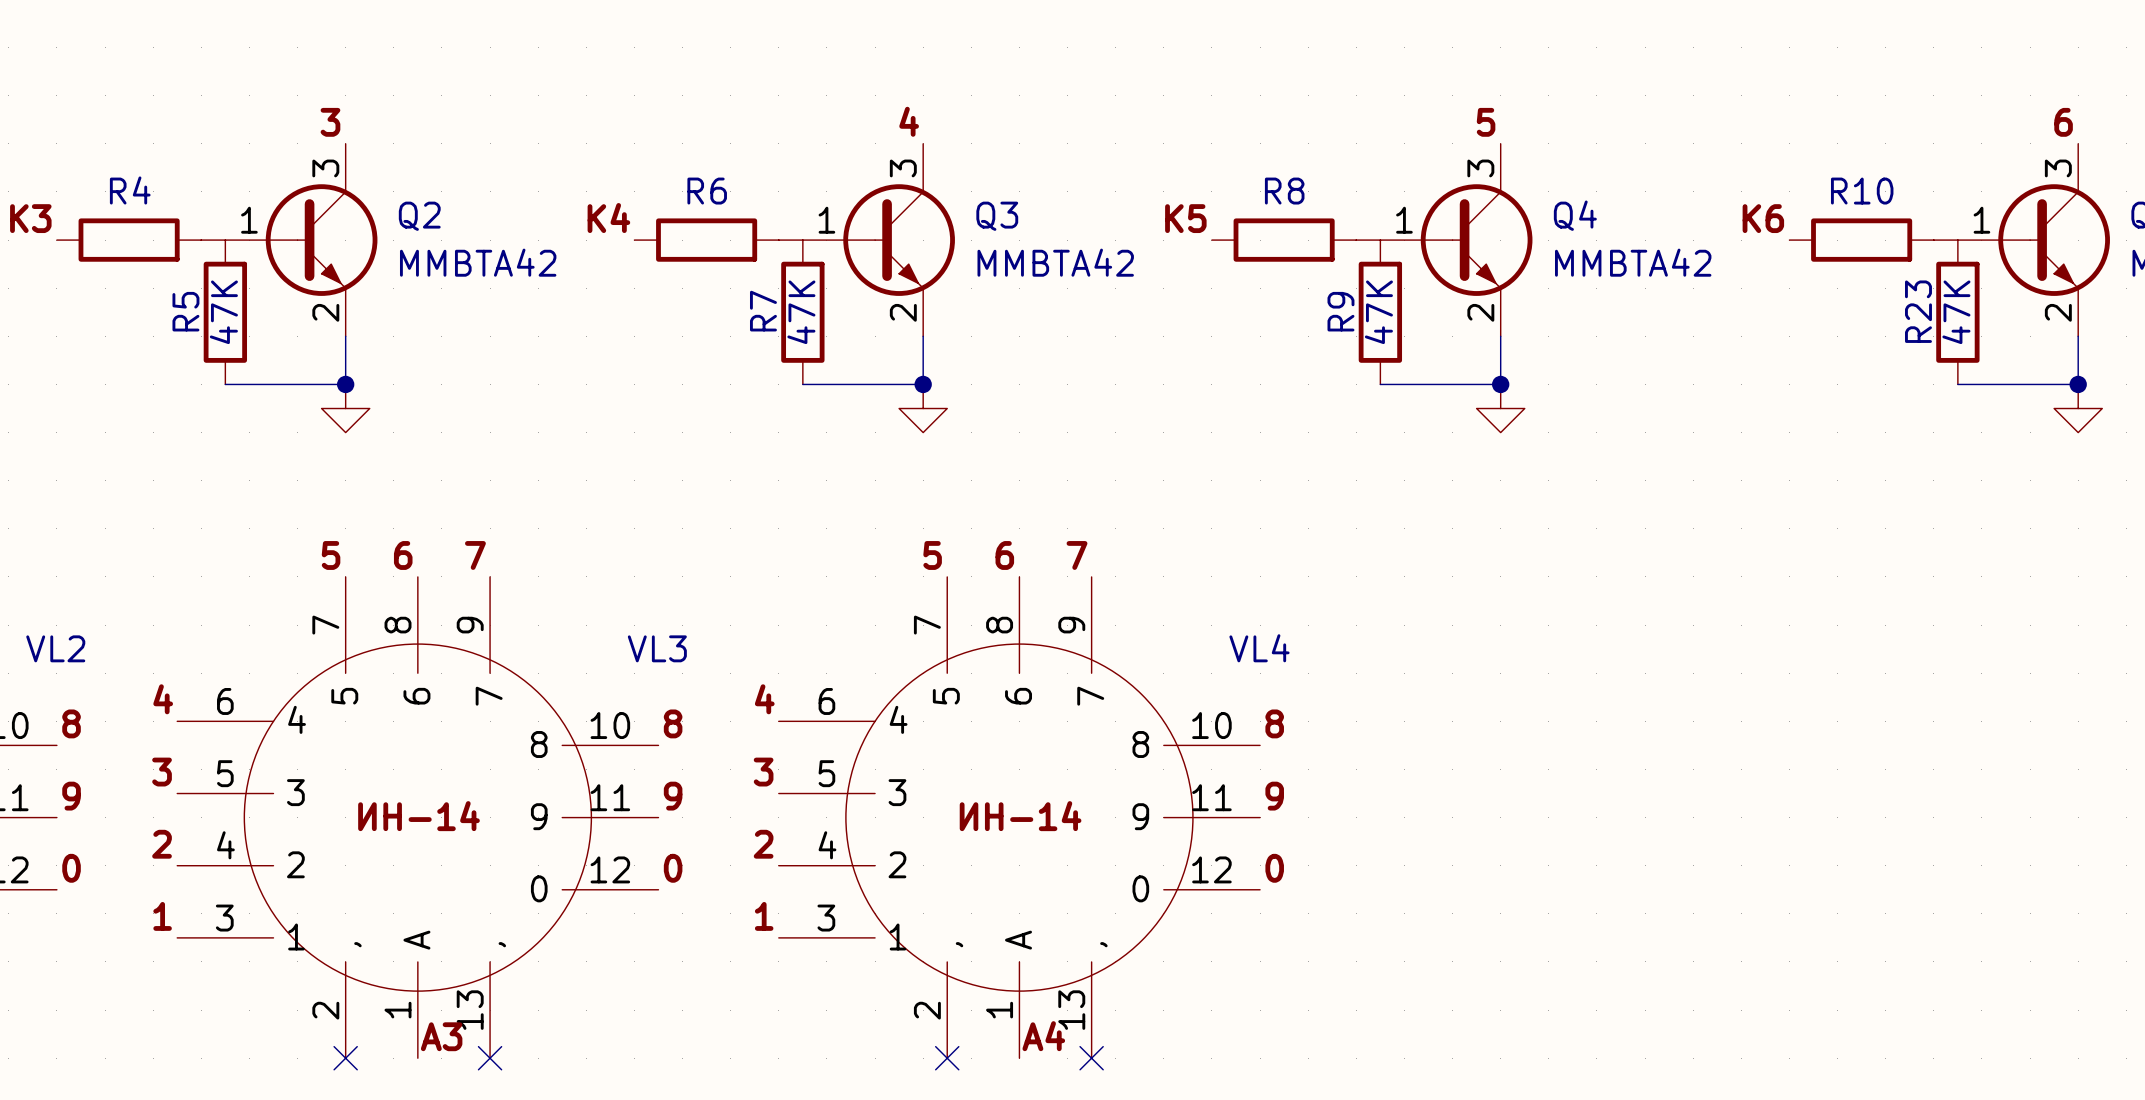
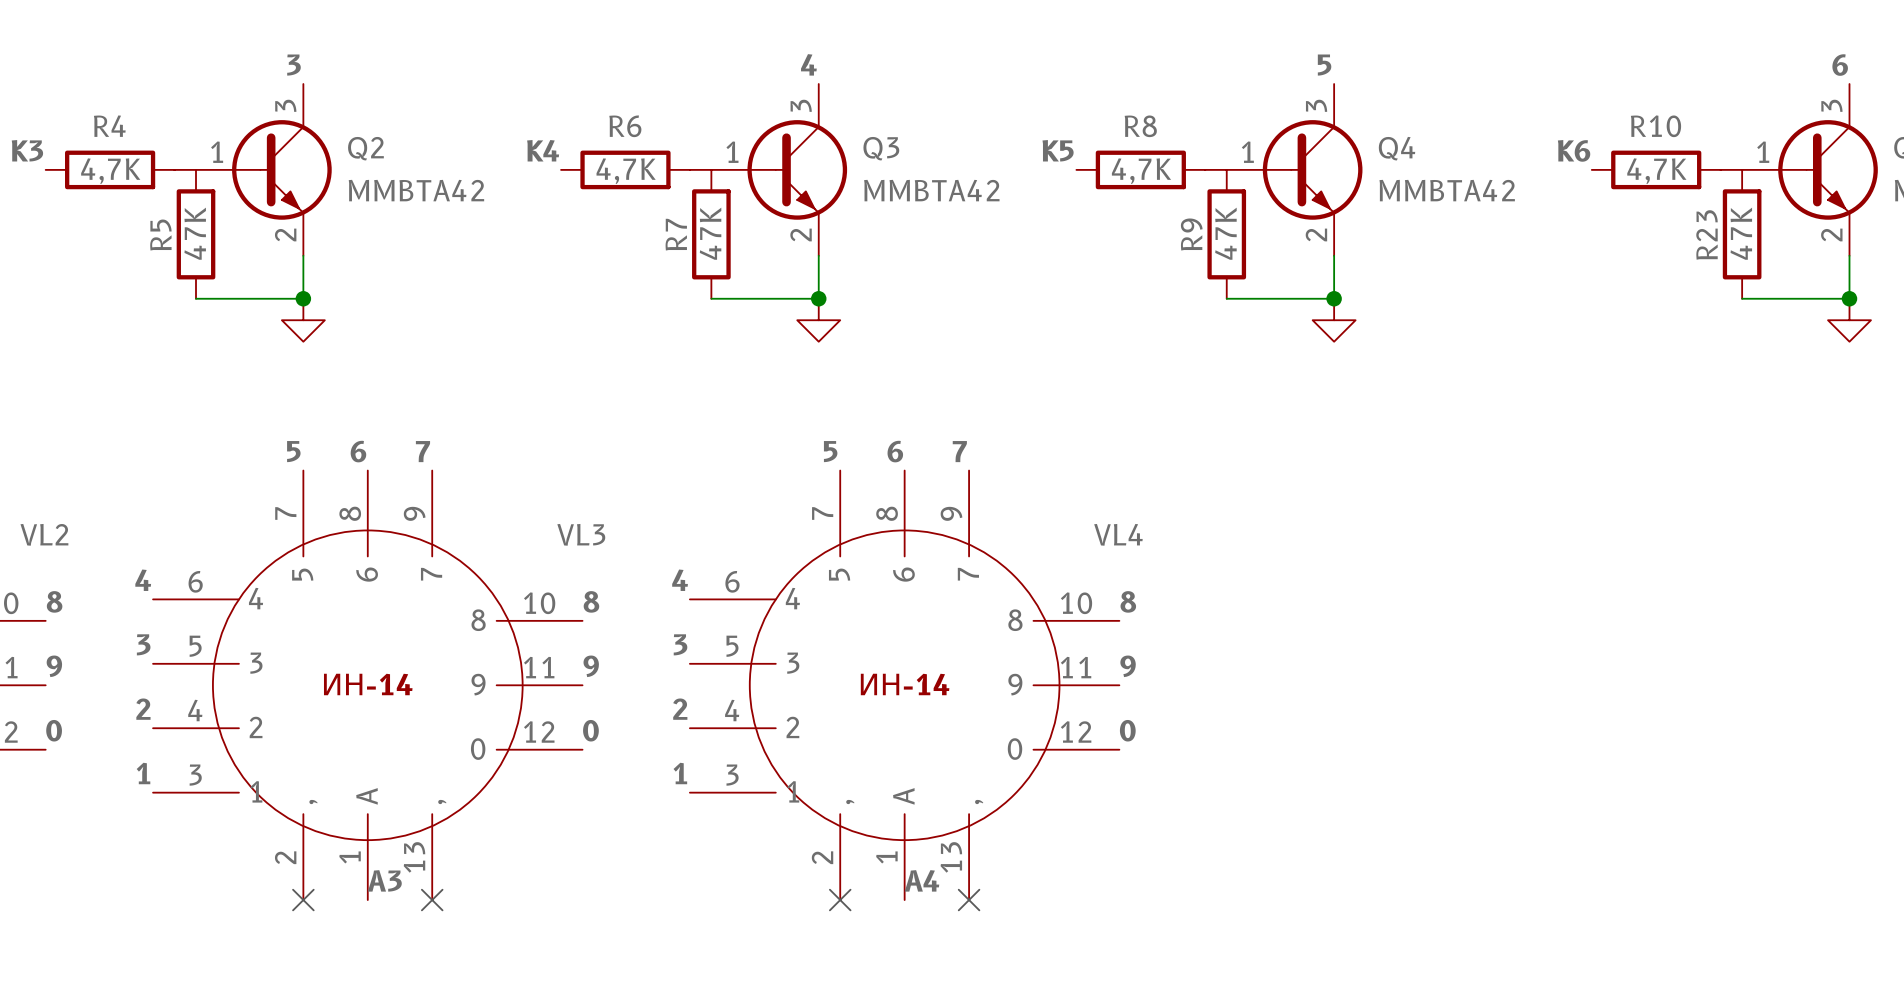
R4 value: none -> 4,7K (110, 171)
R6 value: none -> 4,7K (626, 171)
R8 value: none -> 4,7K (1141, 171)
R10 value: none -> 4,7K (1656, 171)

